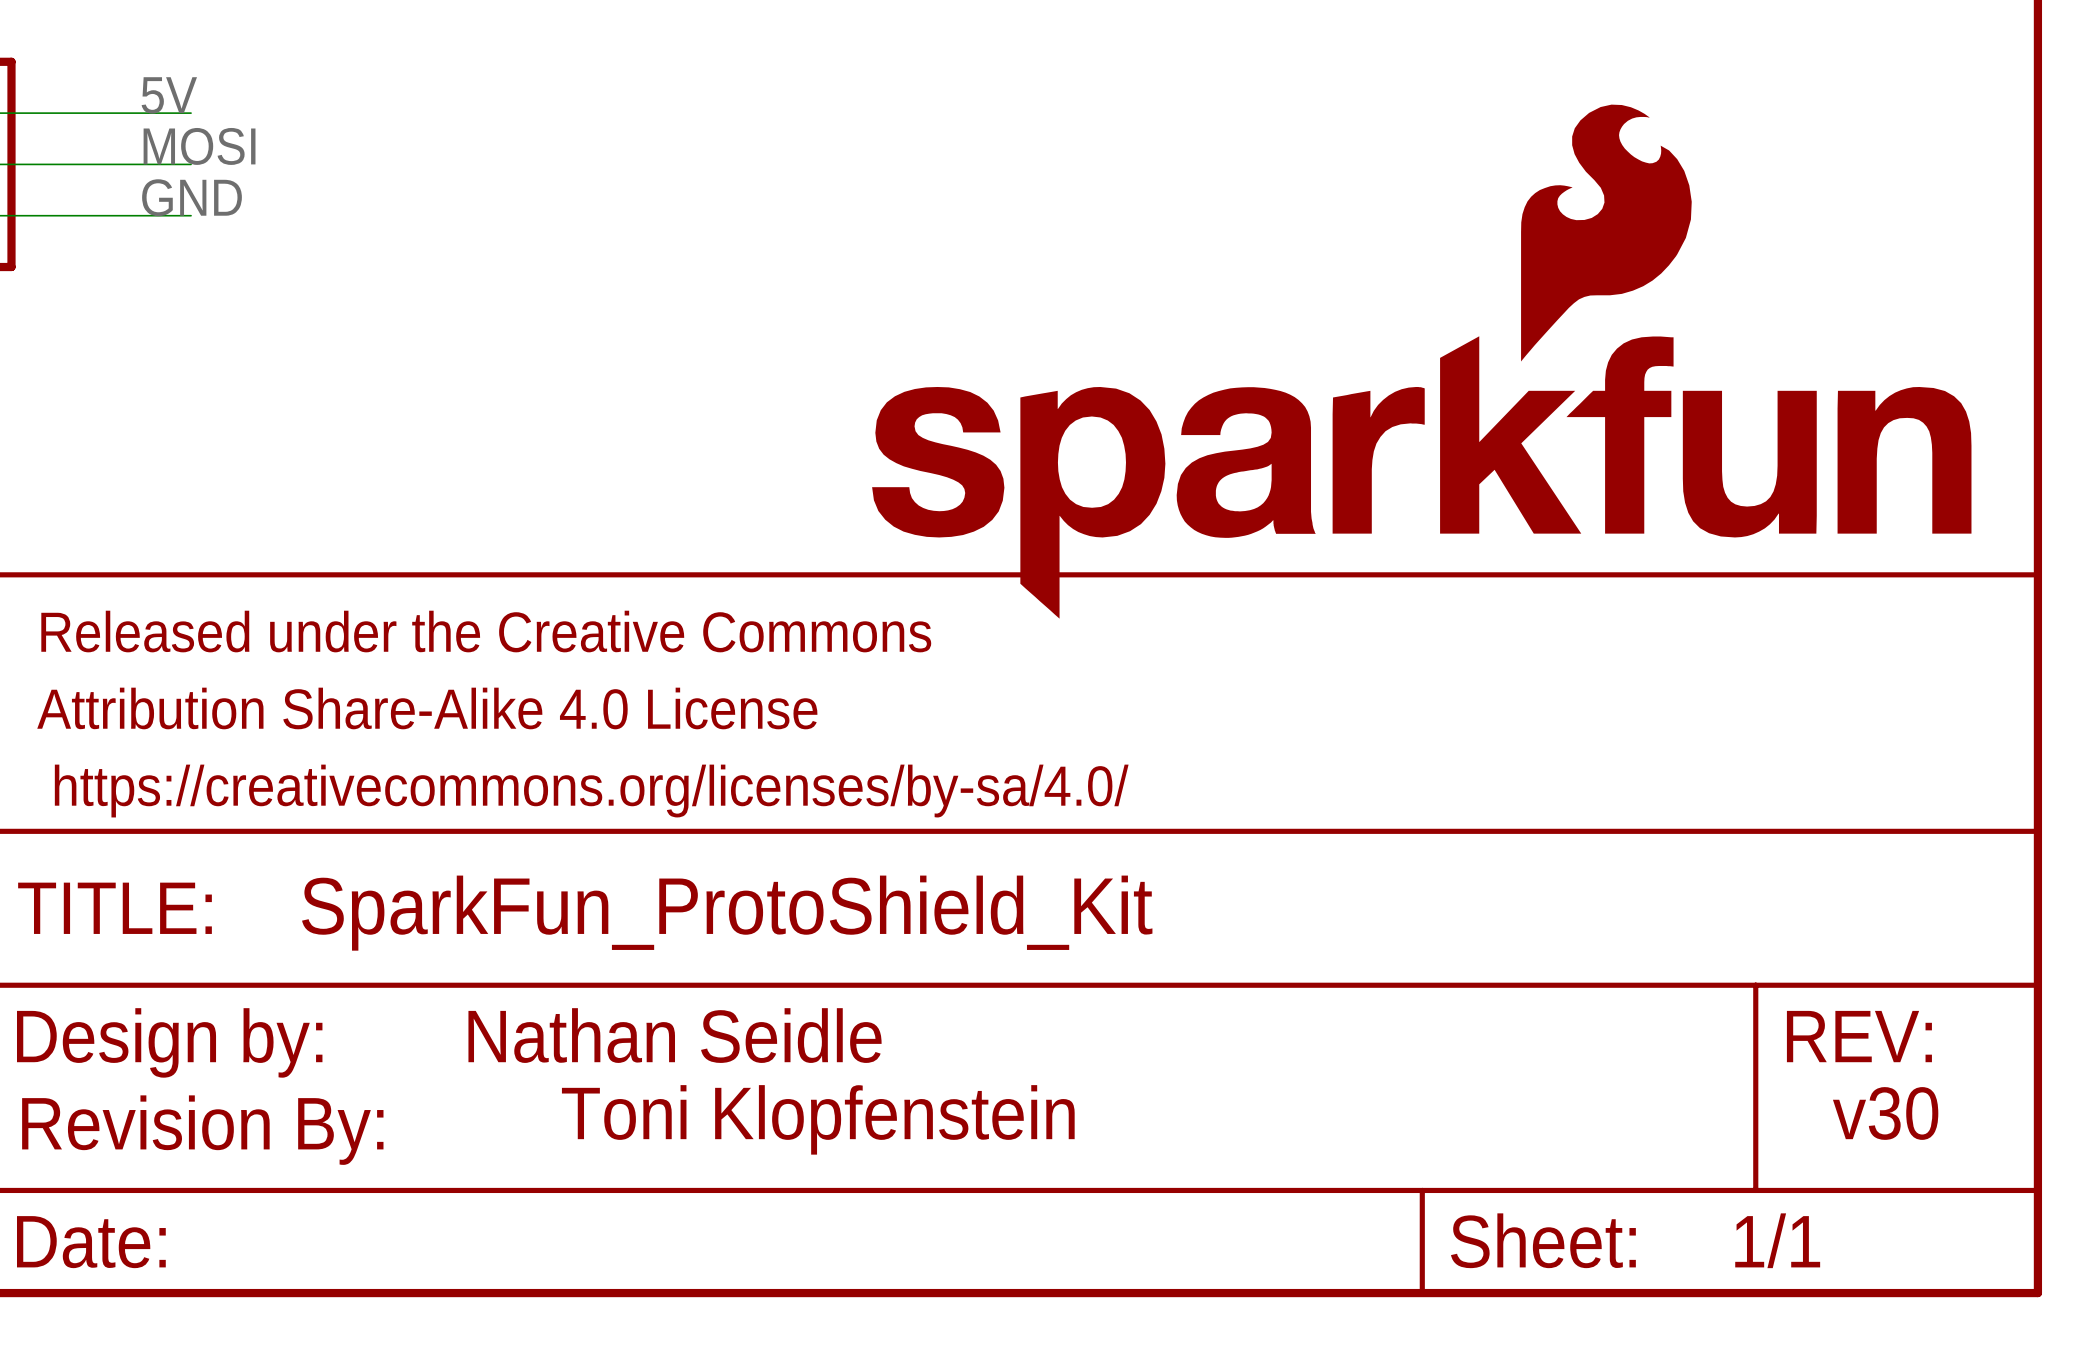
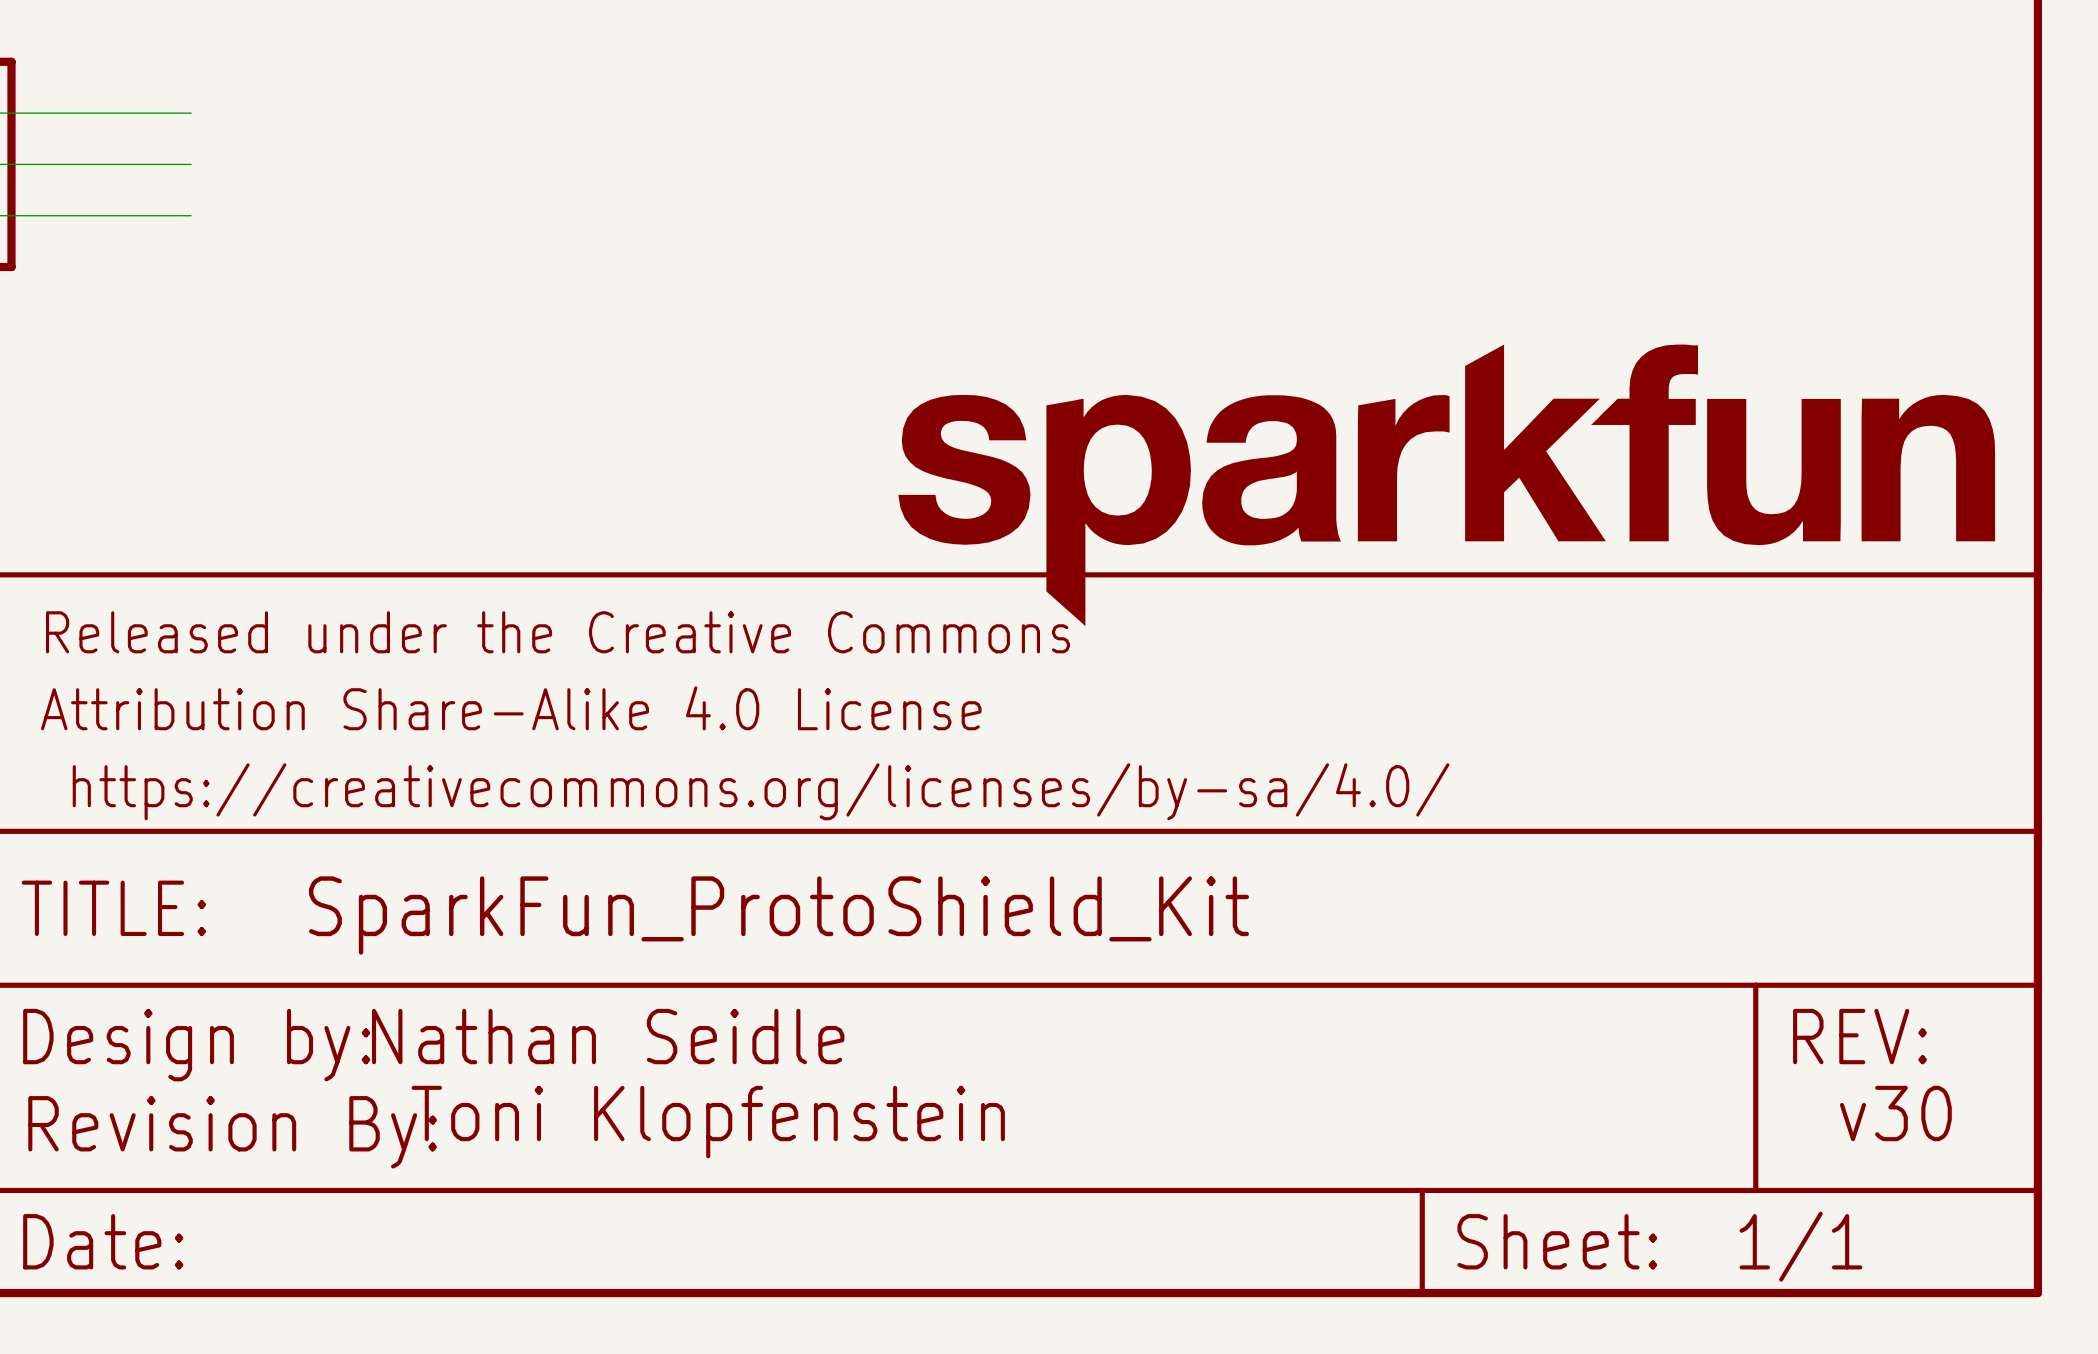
label: 5V (169, 95) -> none
label: MOSI (199, 146) -> none
label: GND (192, 197) -> none
part: (1421, 361) -> none
part: none -> (1446, 485)
text position: Nathan Seidle (675, 1035) -> Nathan Seidle (608, 1036)
text position: Toni Klopfenstein (818, 1119) -> Toni Klopfenstein (708, 1122)

